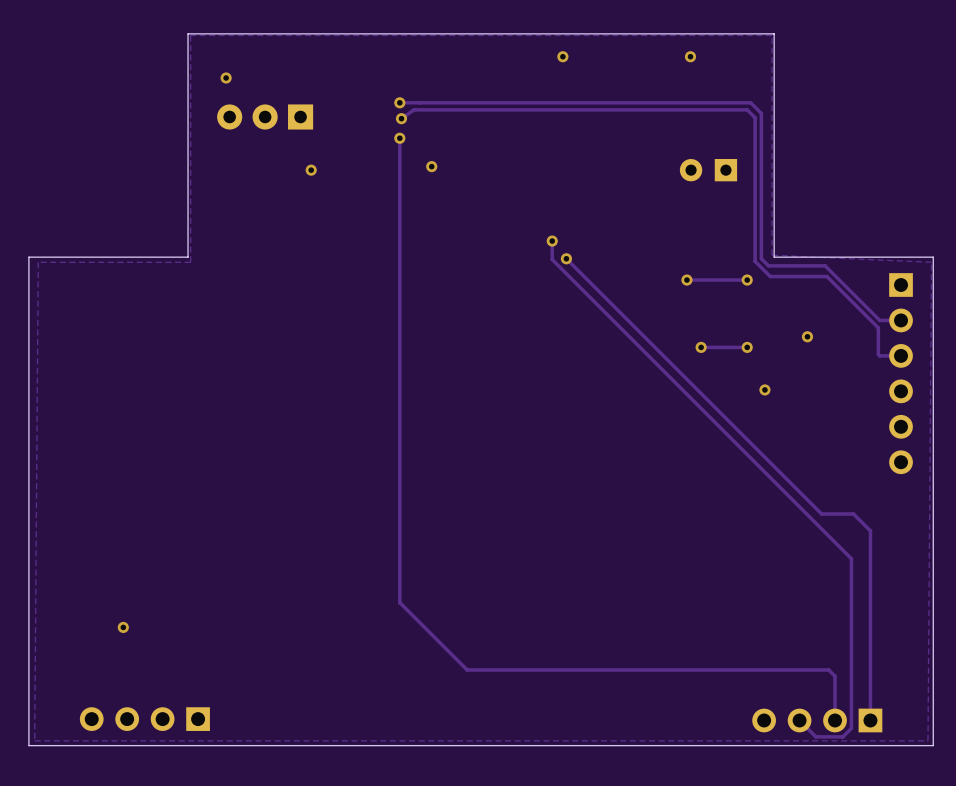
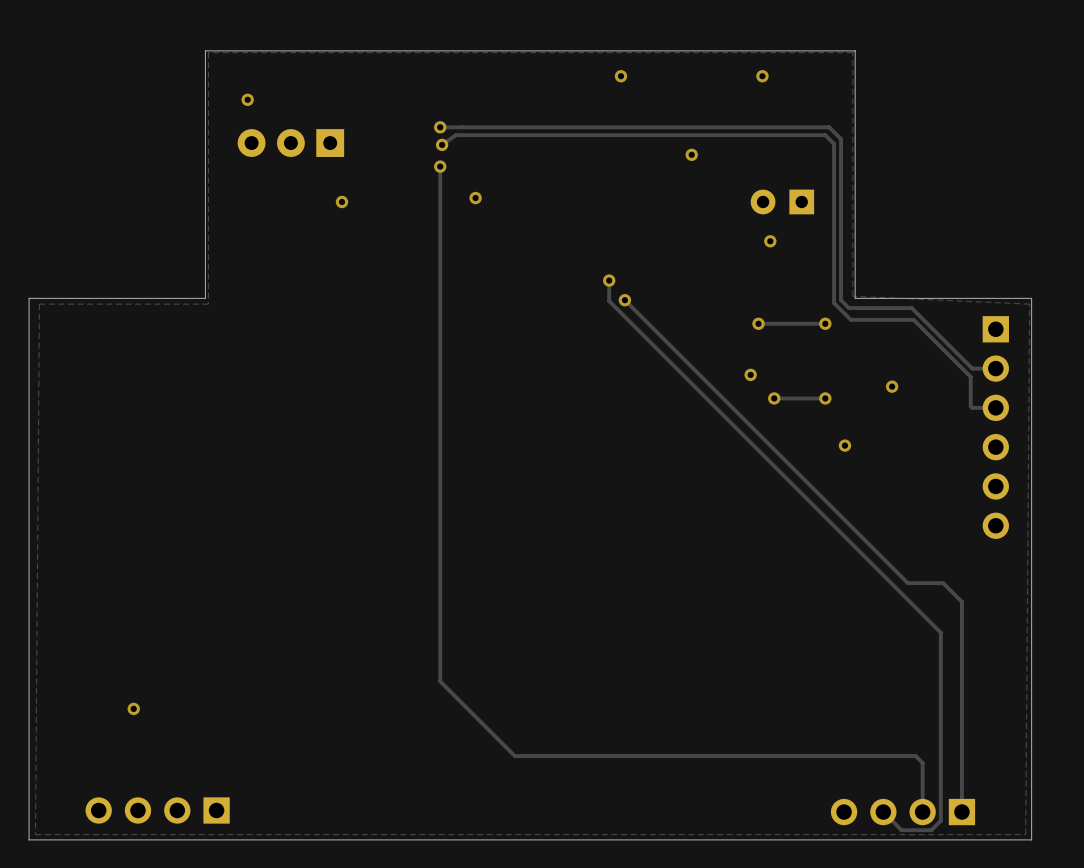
via: none -> (691, 154)
via: none -> (770, 241)
via: none -> (750, 374)

